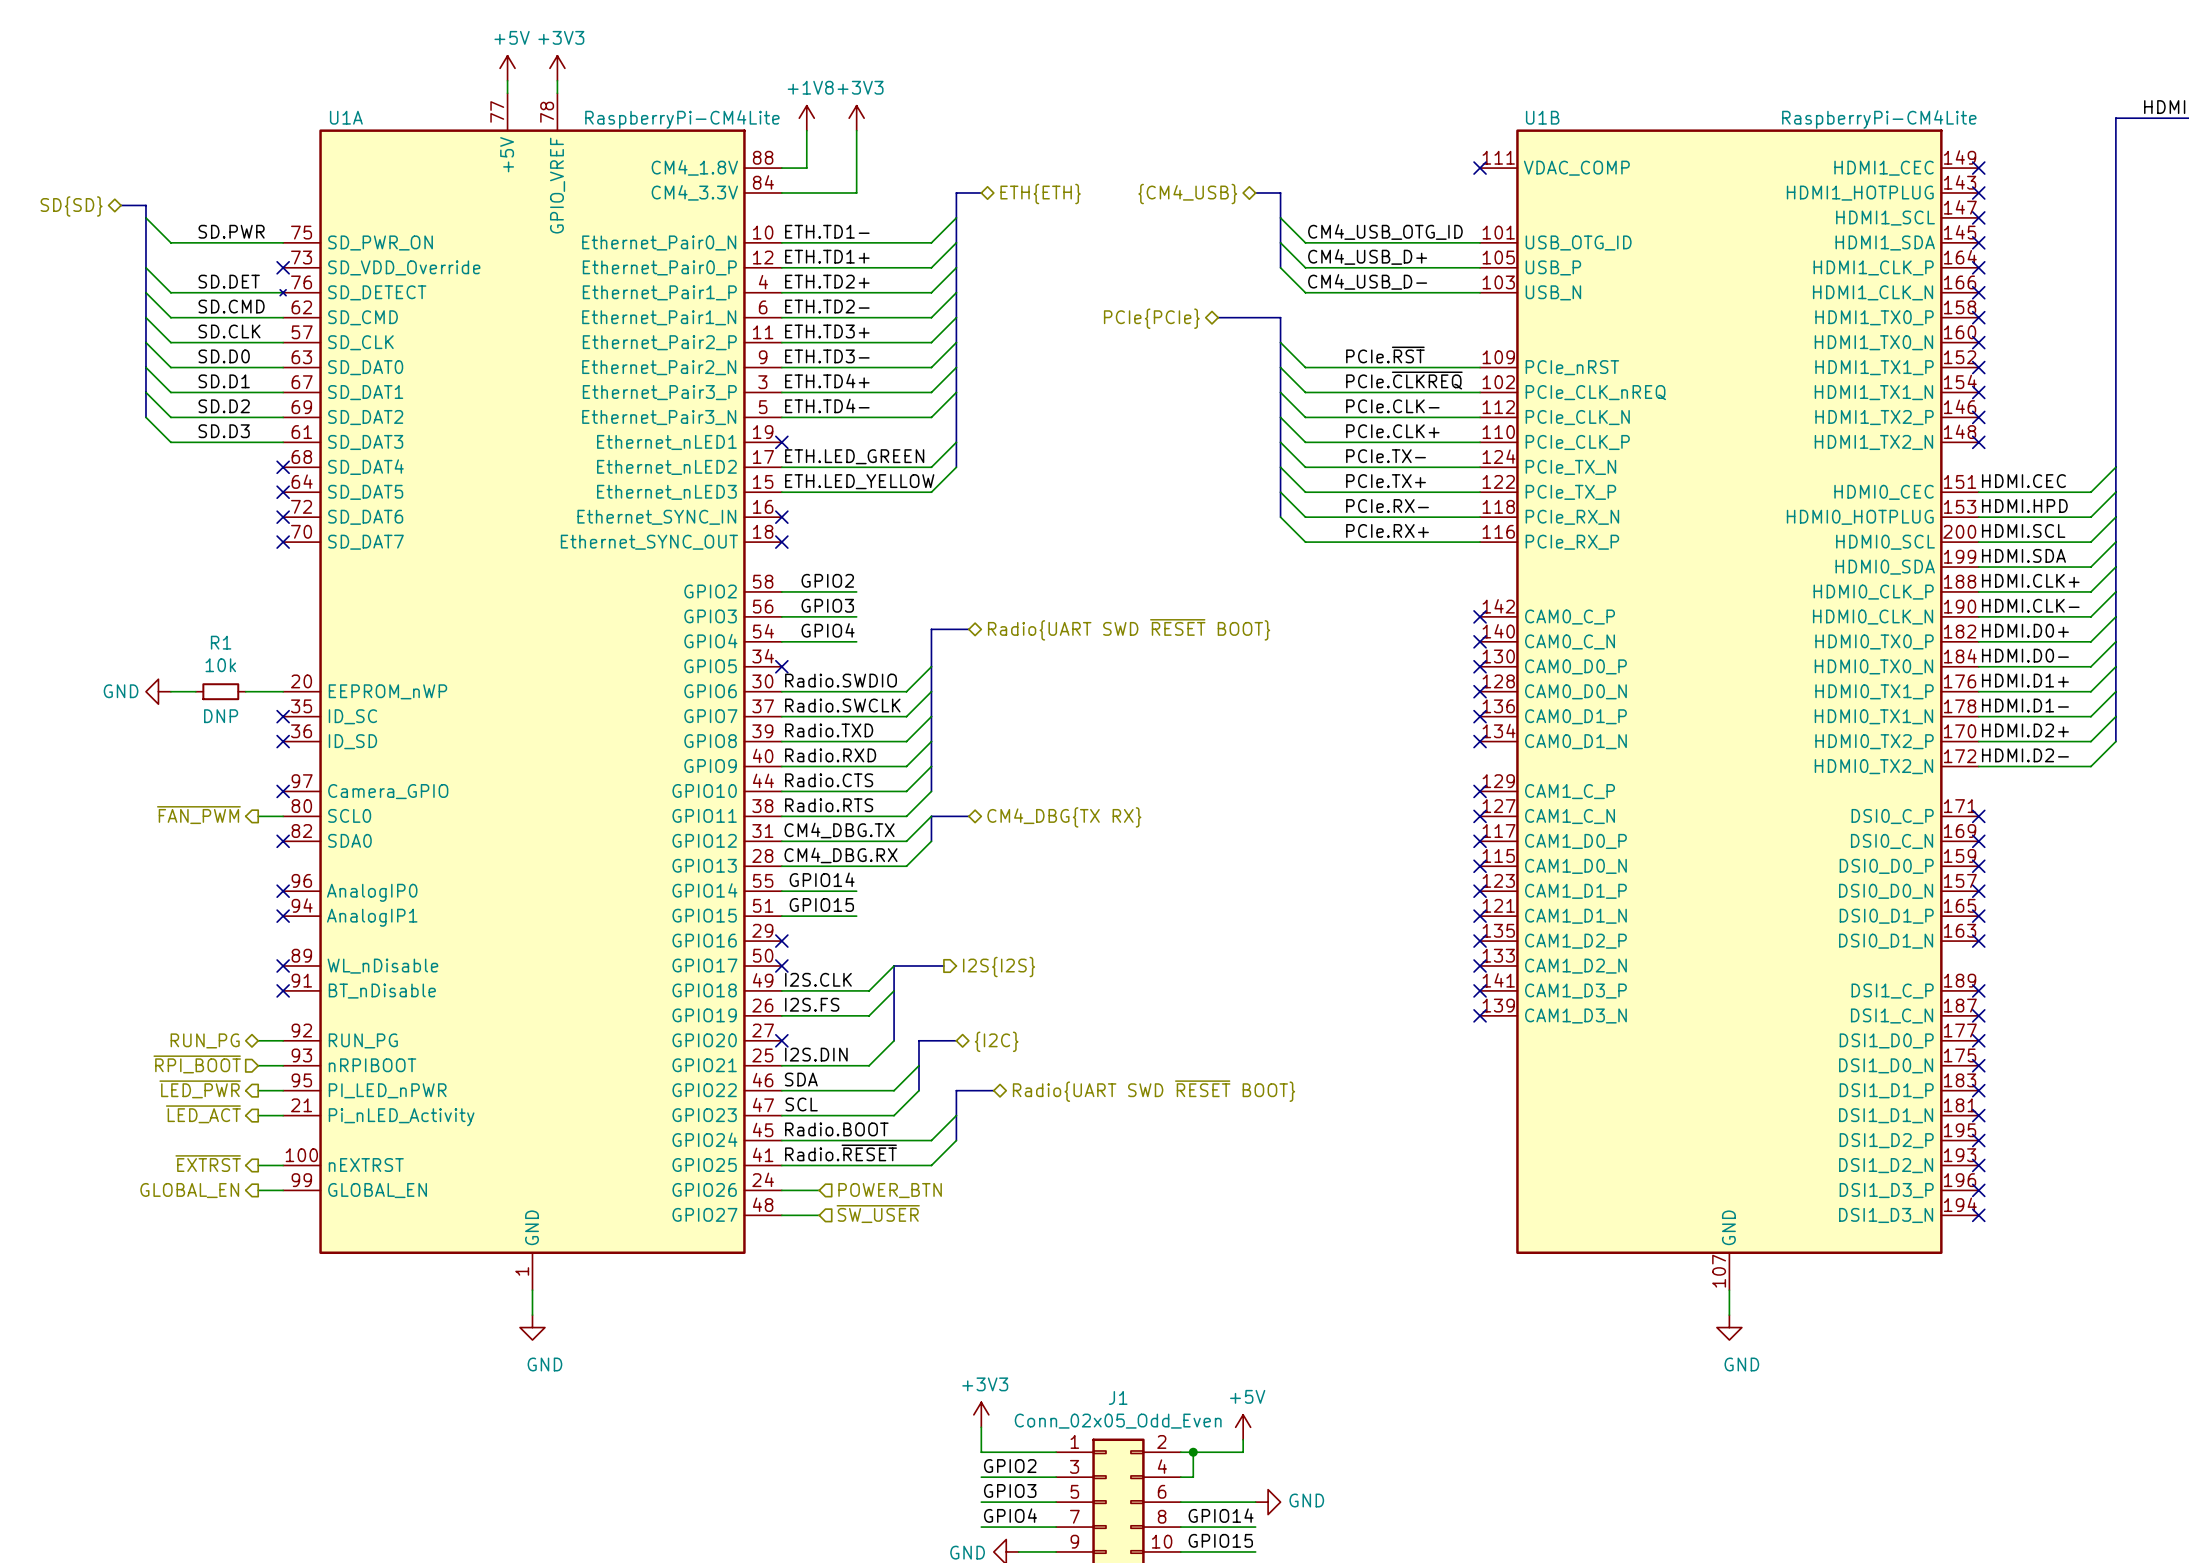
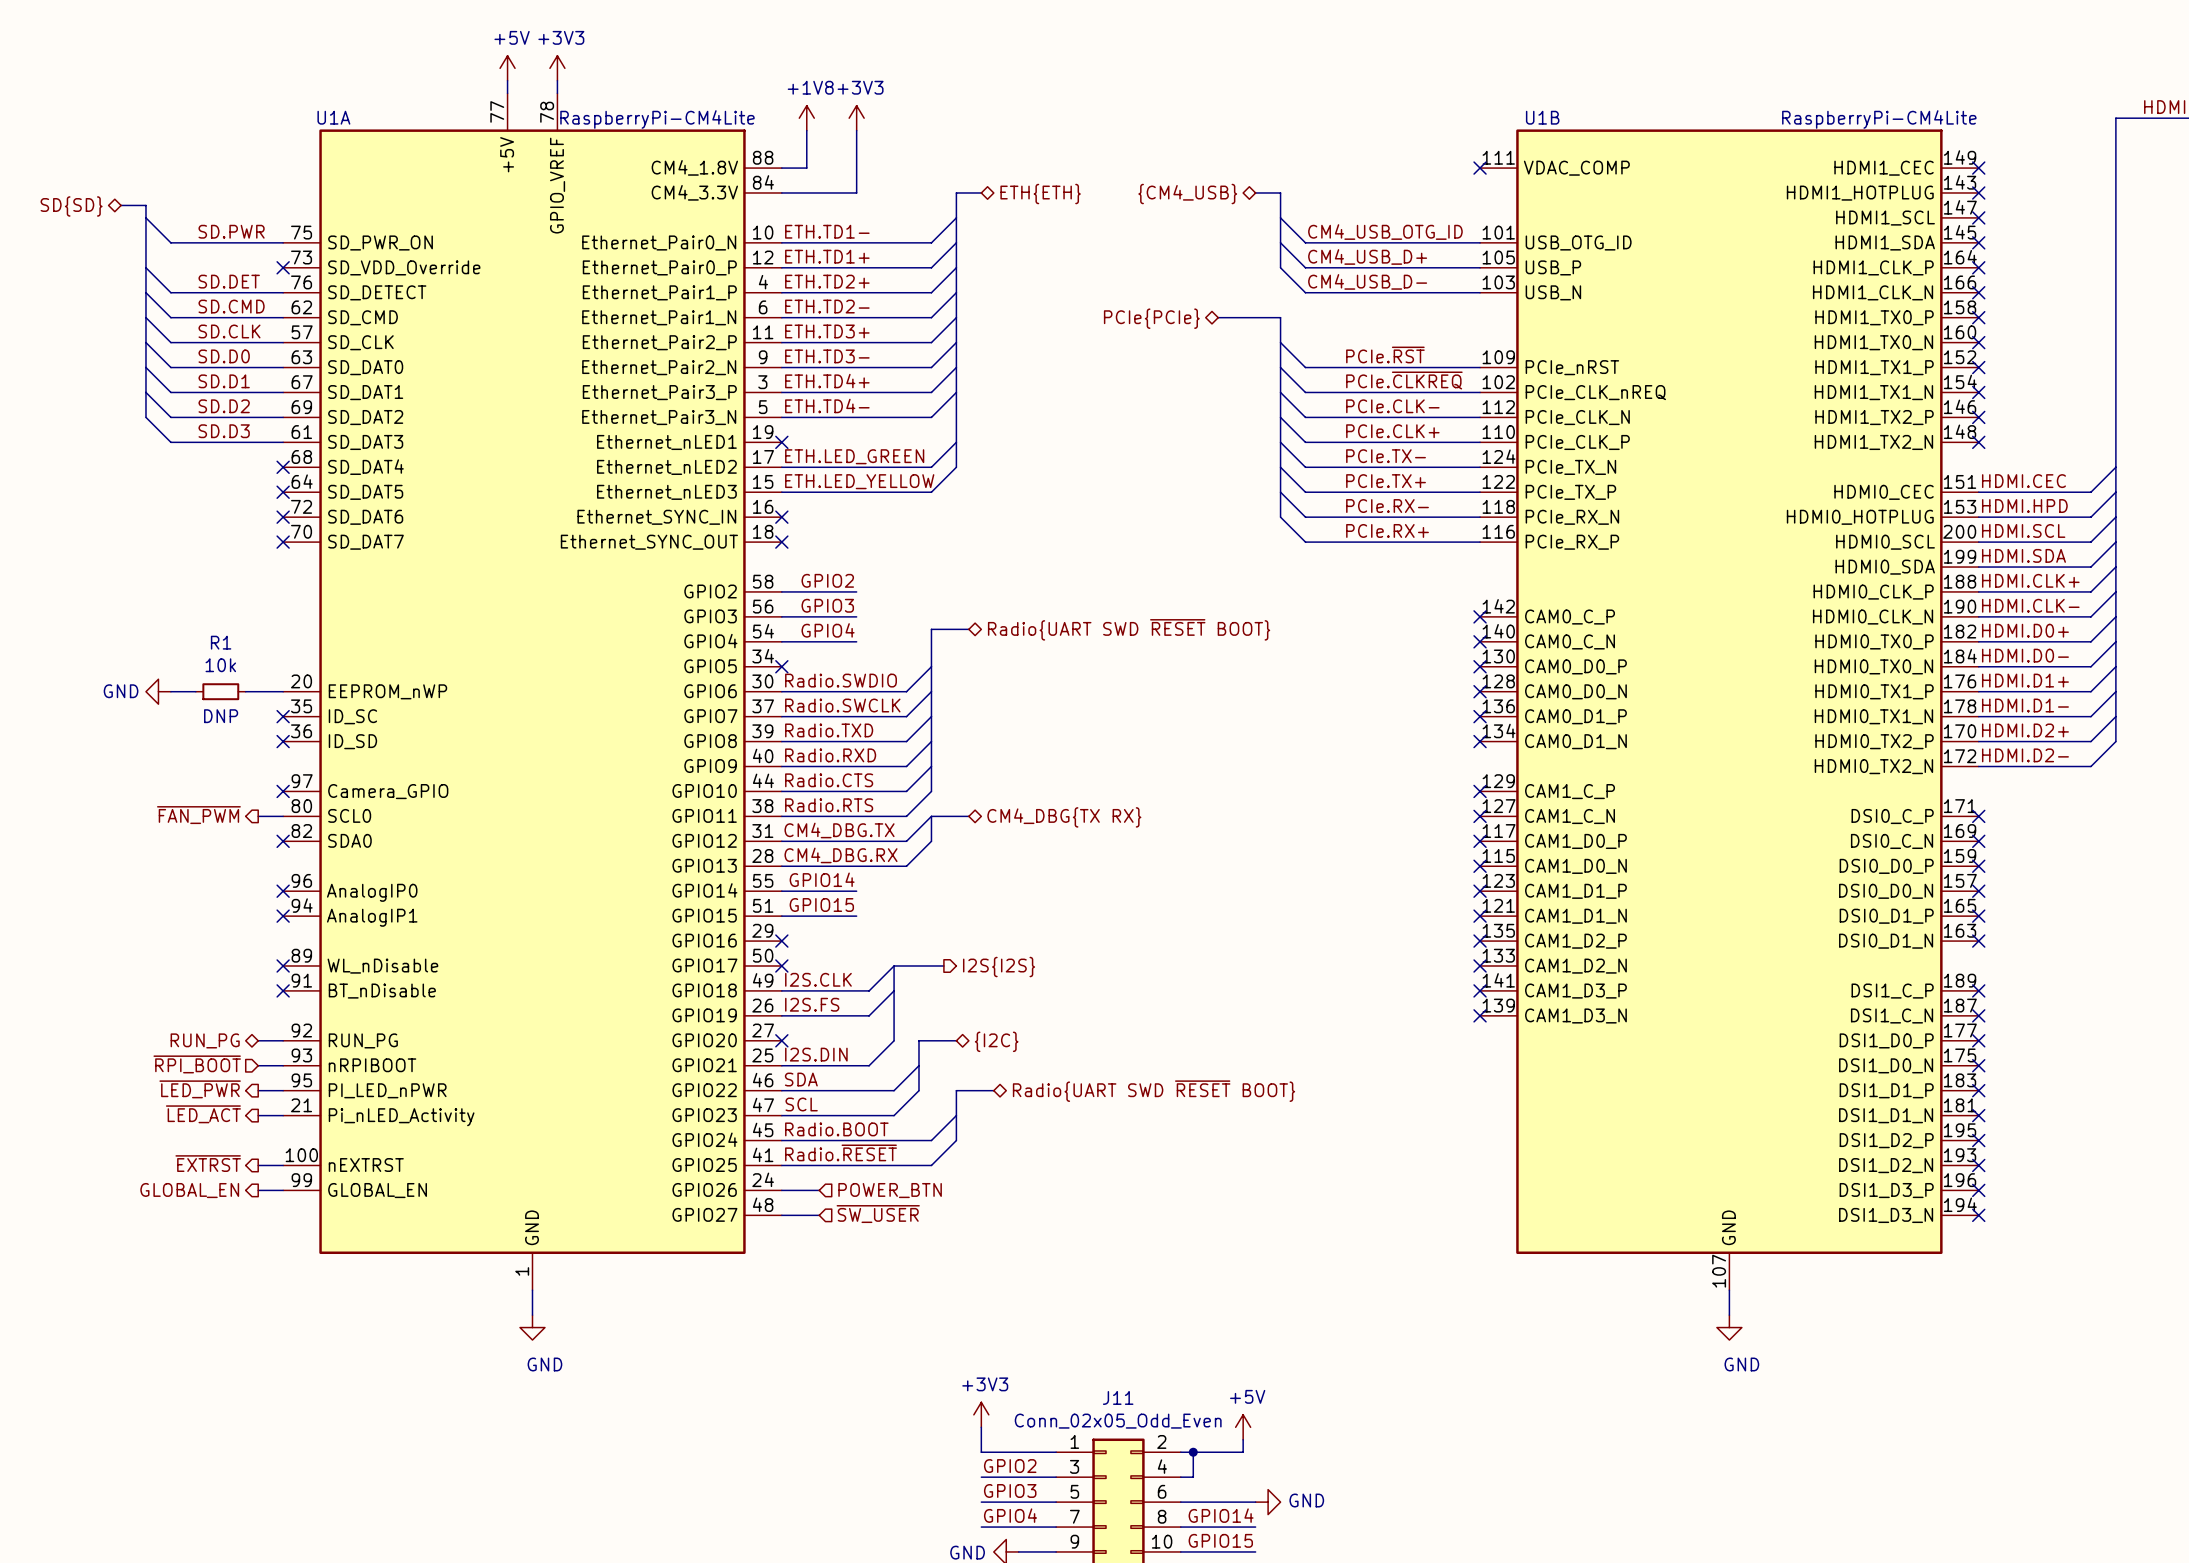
U1A symbol: [280, 93, 782, 1291] -> [283, 93, 782, 1291]
U1A value position: RaspberryPi-CM4Lite (682, 119) -> RaspberryPi-CM4Lite (657, 119)
J1 name: J1 (1118, 1397) -> J11 (1118, 1397)

